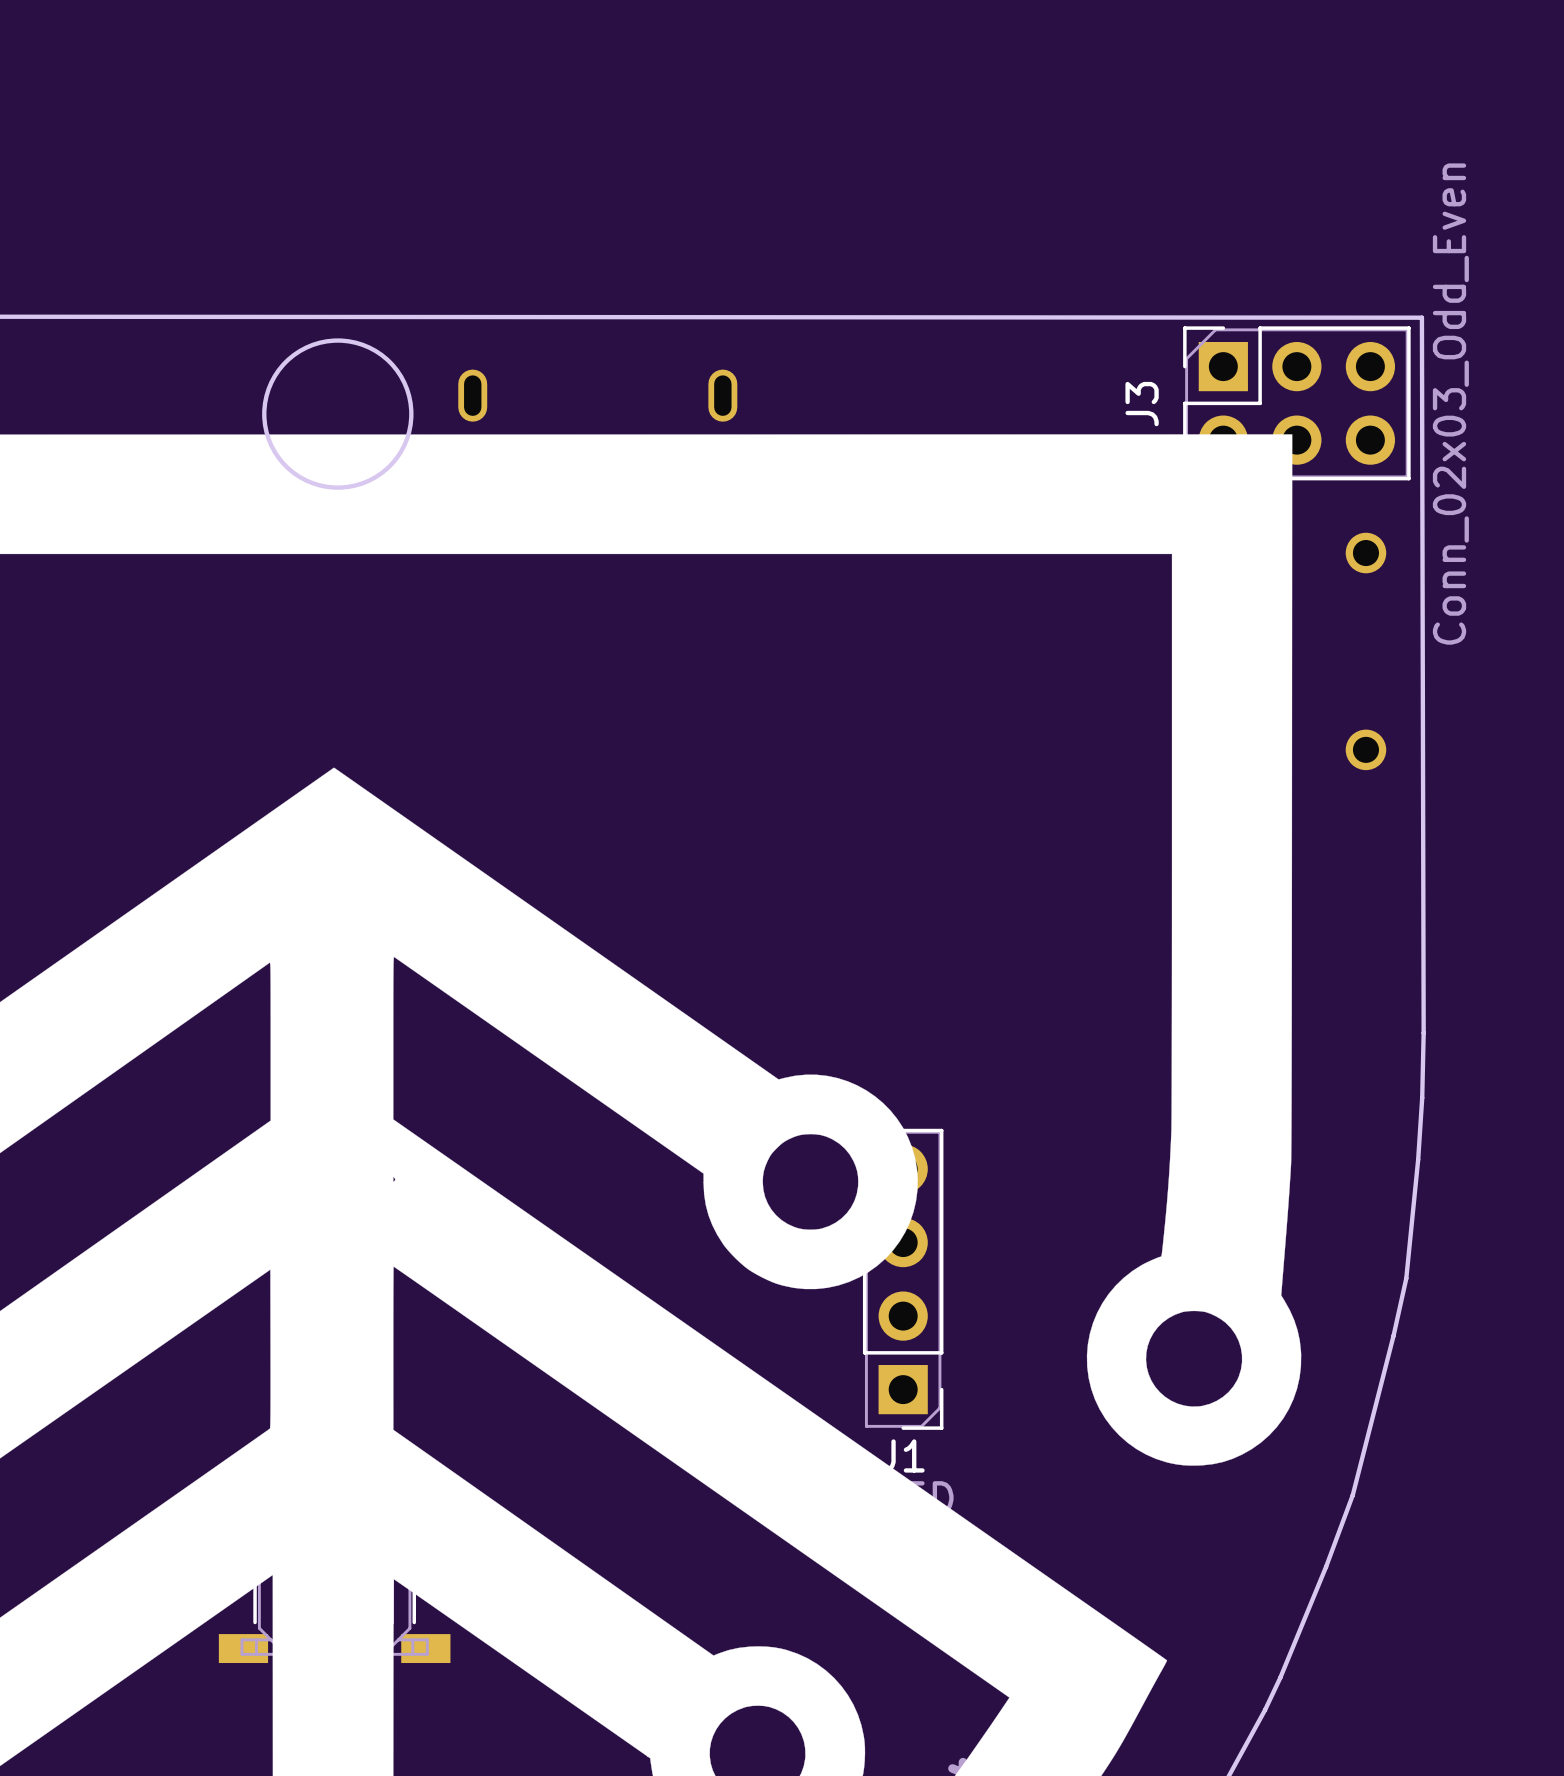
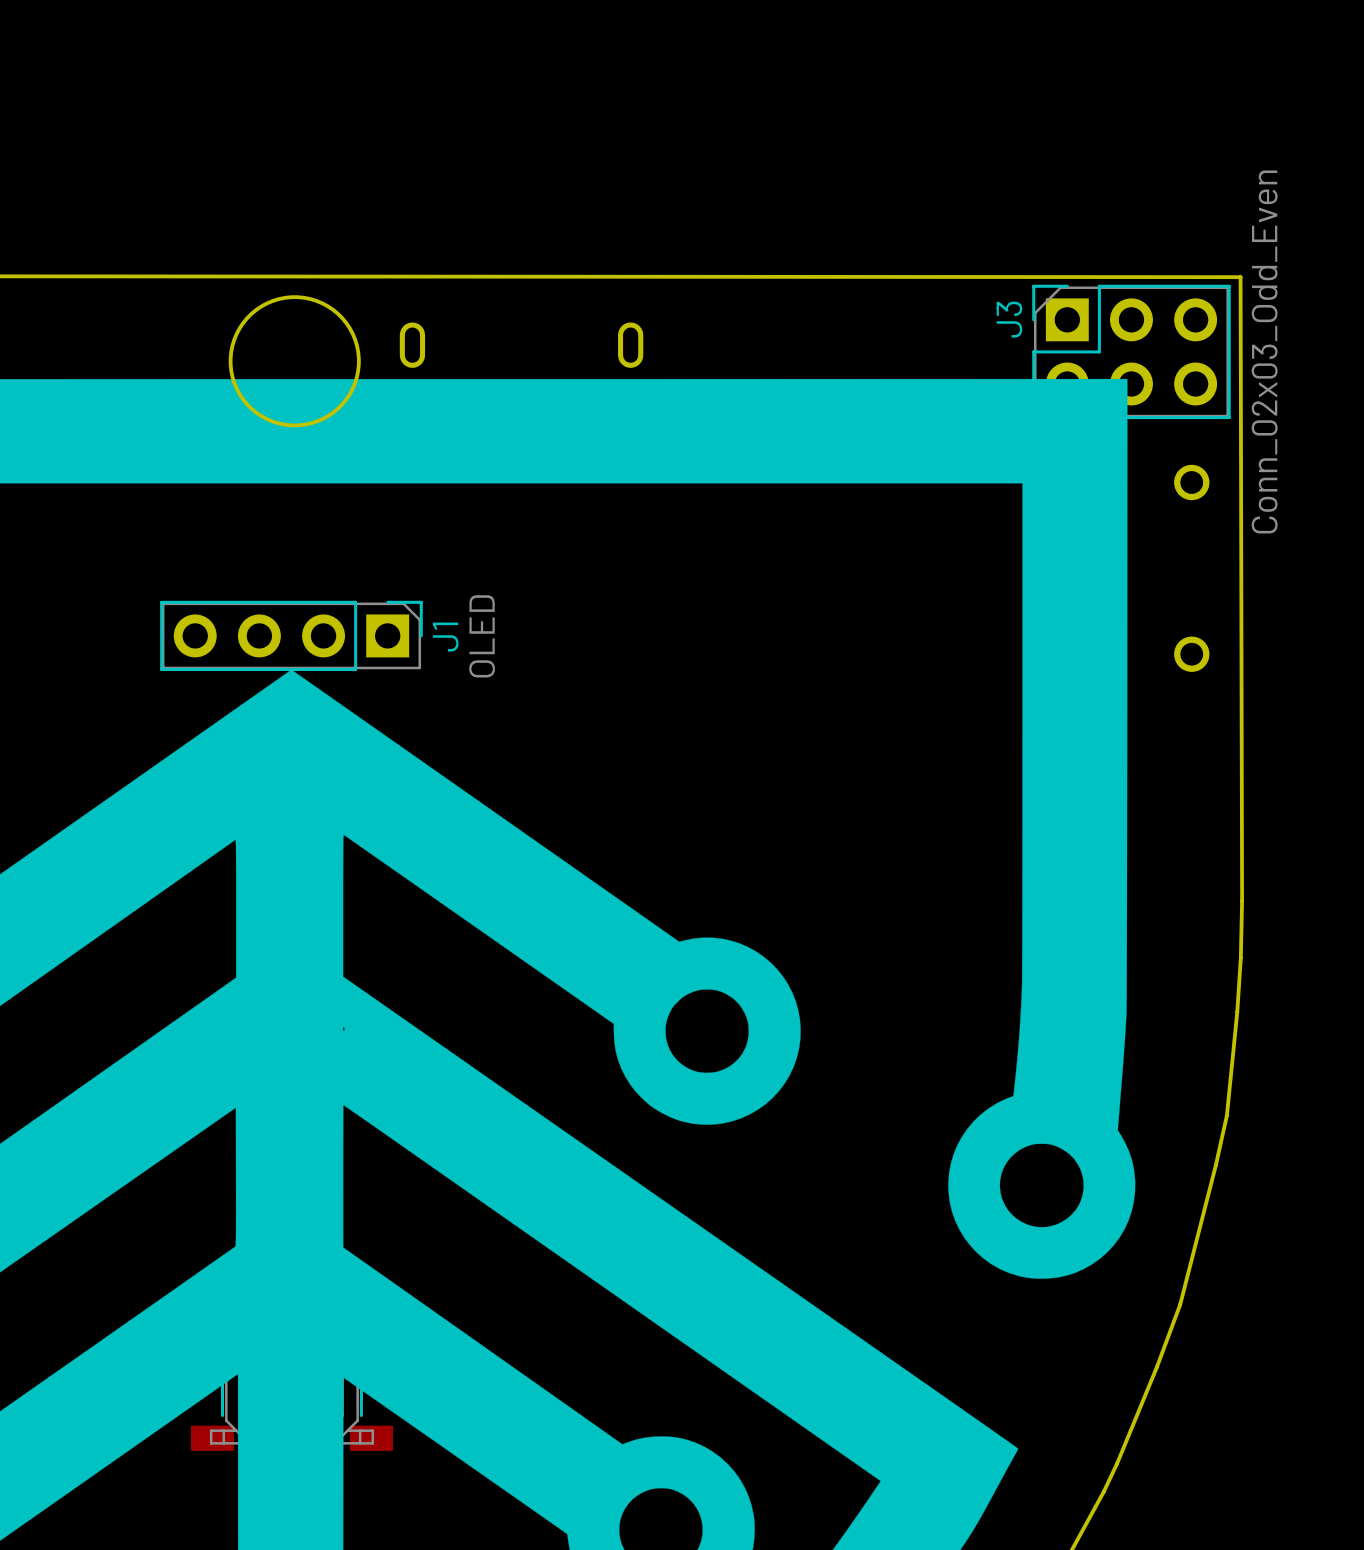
J3 name position: J3 (1142, 404) -> J3 (1009, 319)
J1 rotation: 0° (903, 1279) -> 90° counterclockwise (291, 635)
J1 position: (903, 1279) -> (291, 635)

